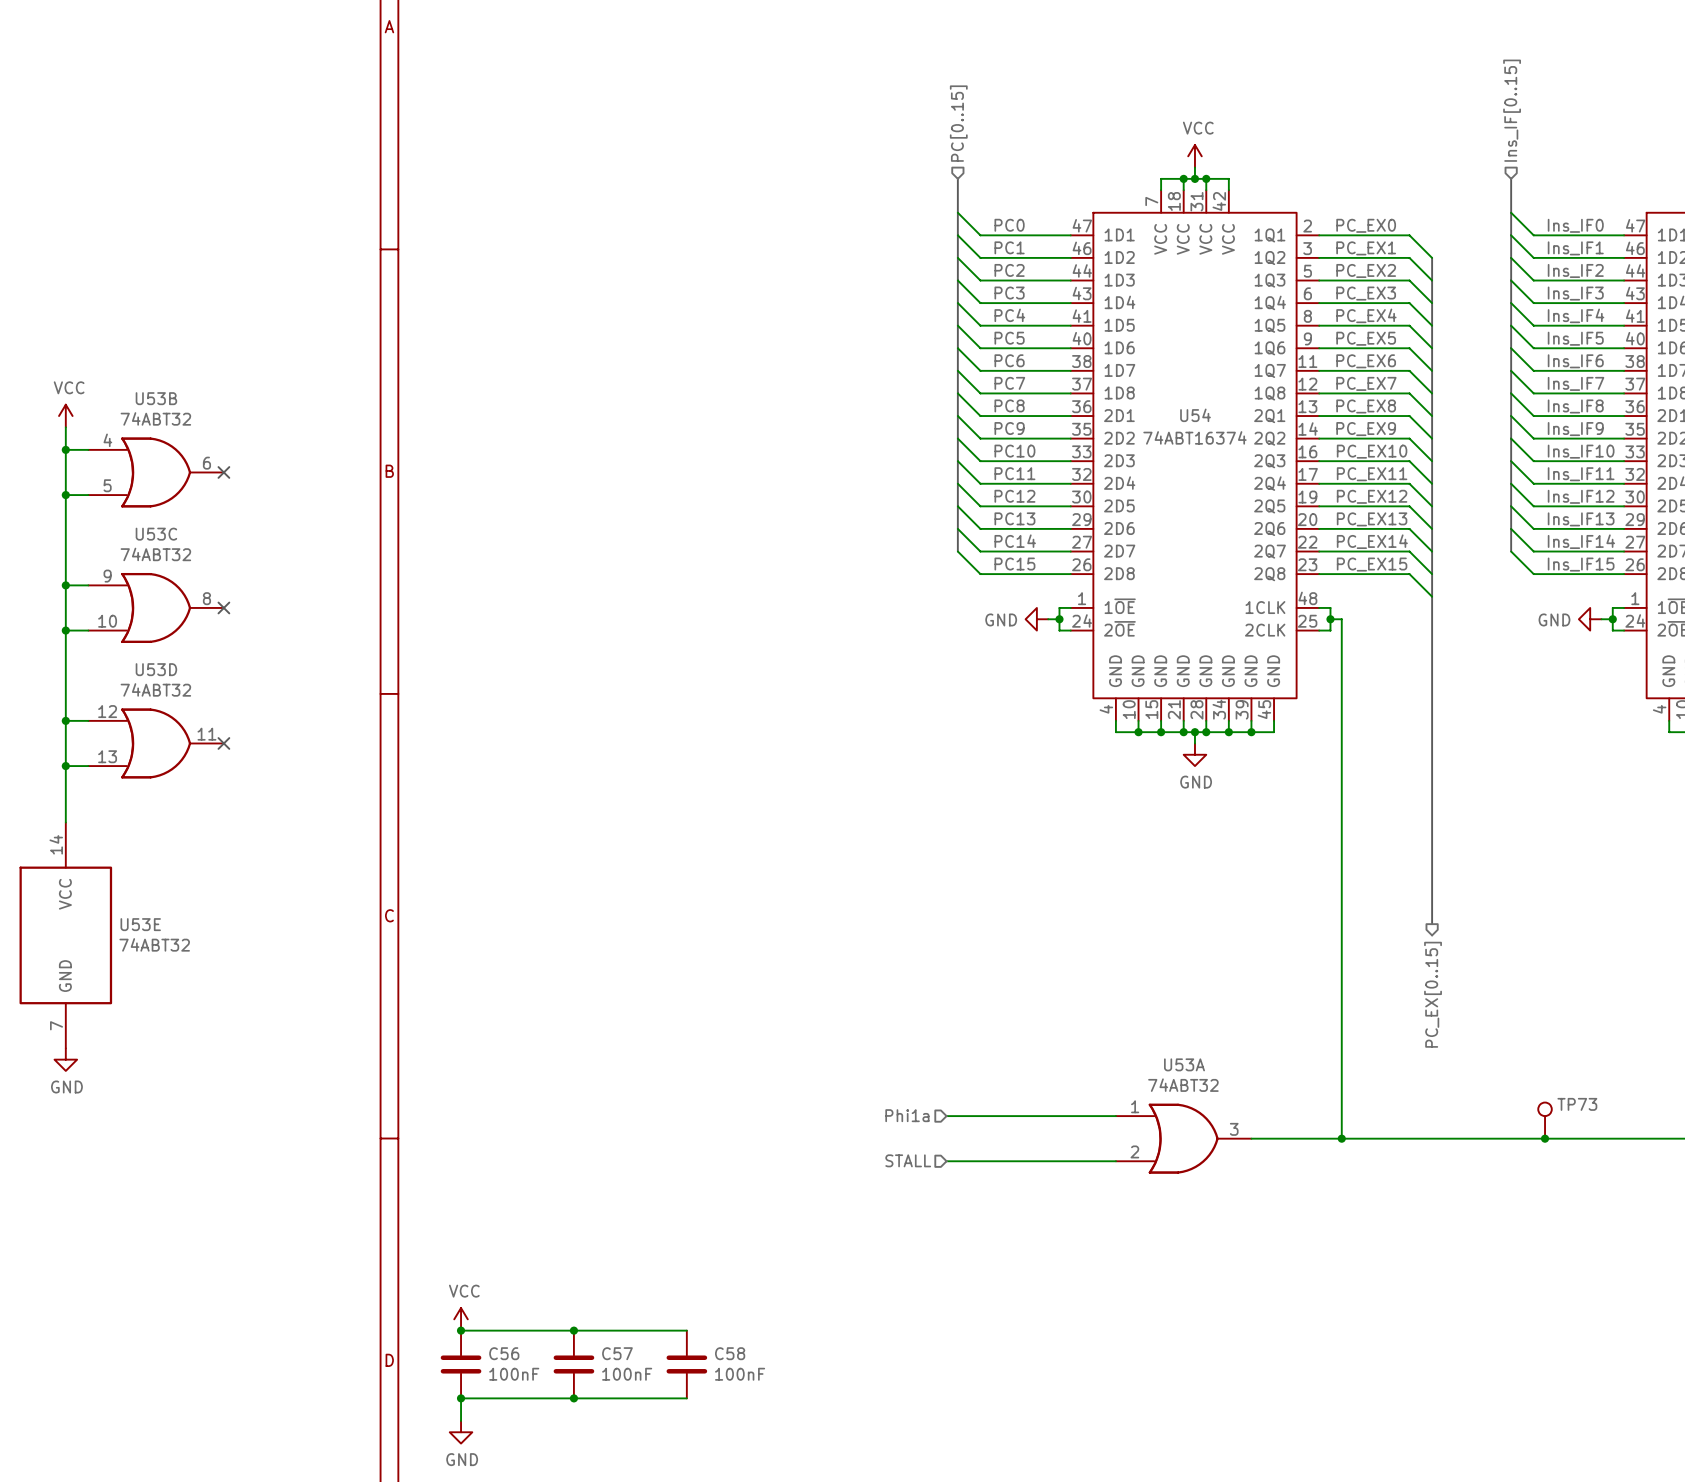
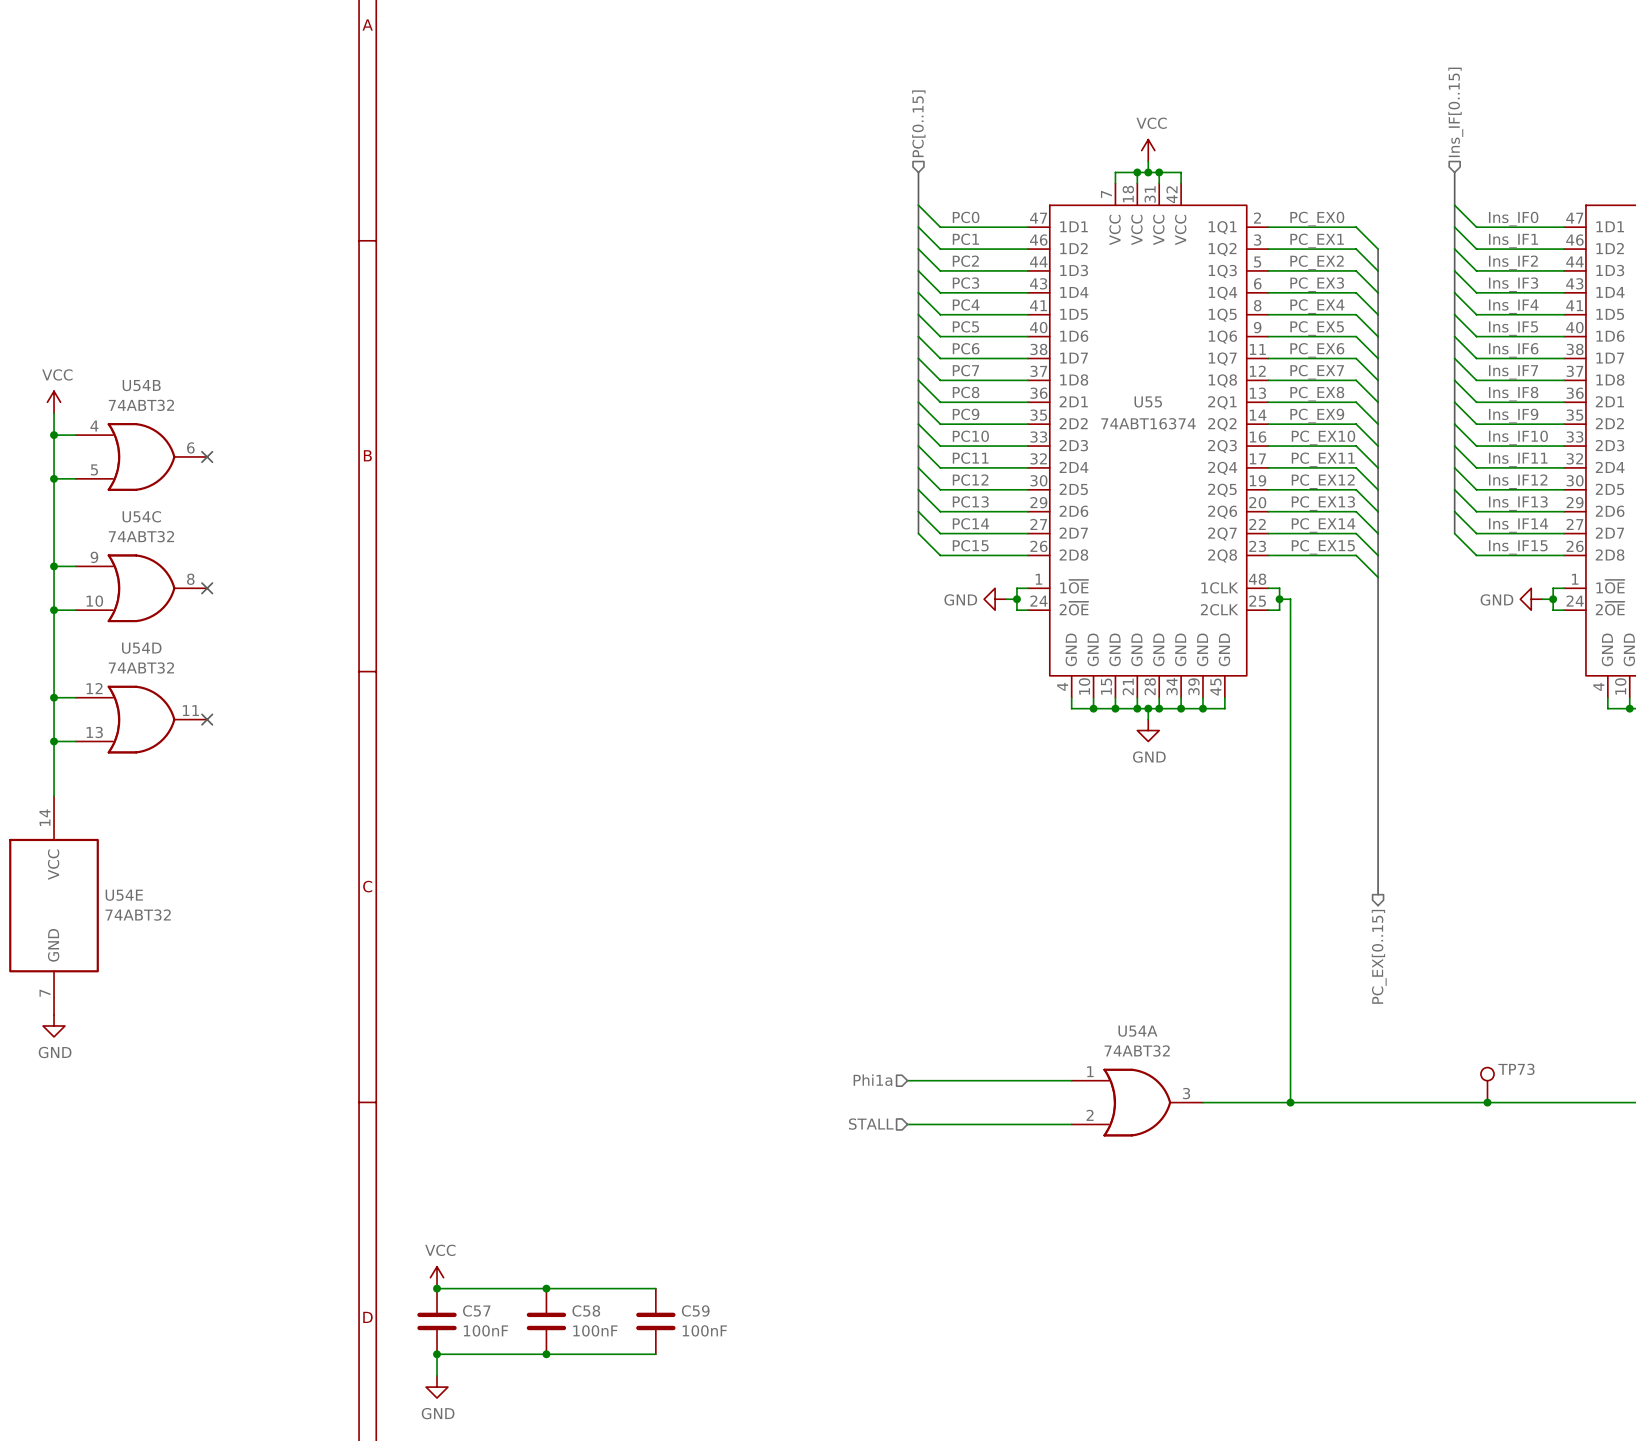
U53B name: U53B (156, 398) -> U54B (141, 385)
U54 name: U54 (1195, 415) -> U55 (1148, 401)
U53C name: U53C (156, 534) -> U54C (141, 516)
U53D name: U53D (156, 669) -> U54D (141, 648)
U53E name: U53E (140, 924) -> U54E (124, 895)
U53A name: U53A (1184, 1064) -> U54A (1137, 1031)
C56 name: C56 (504, 1353) -> C57 (476, 1310)
C57 name: C57 (617, 1353) -> C58 (586, 1310)
C58 name: C58 (730, 1353) -> C59 (695, 1310)

